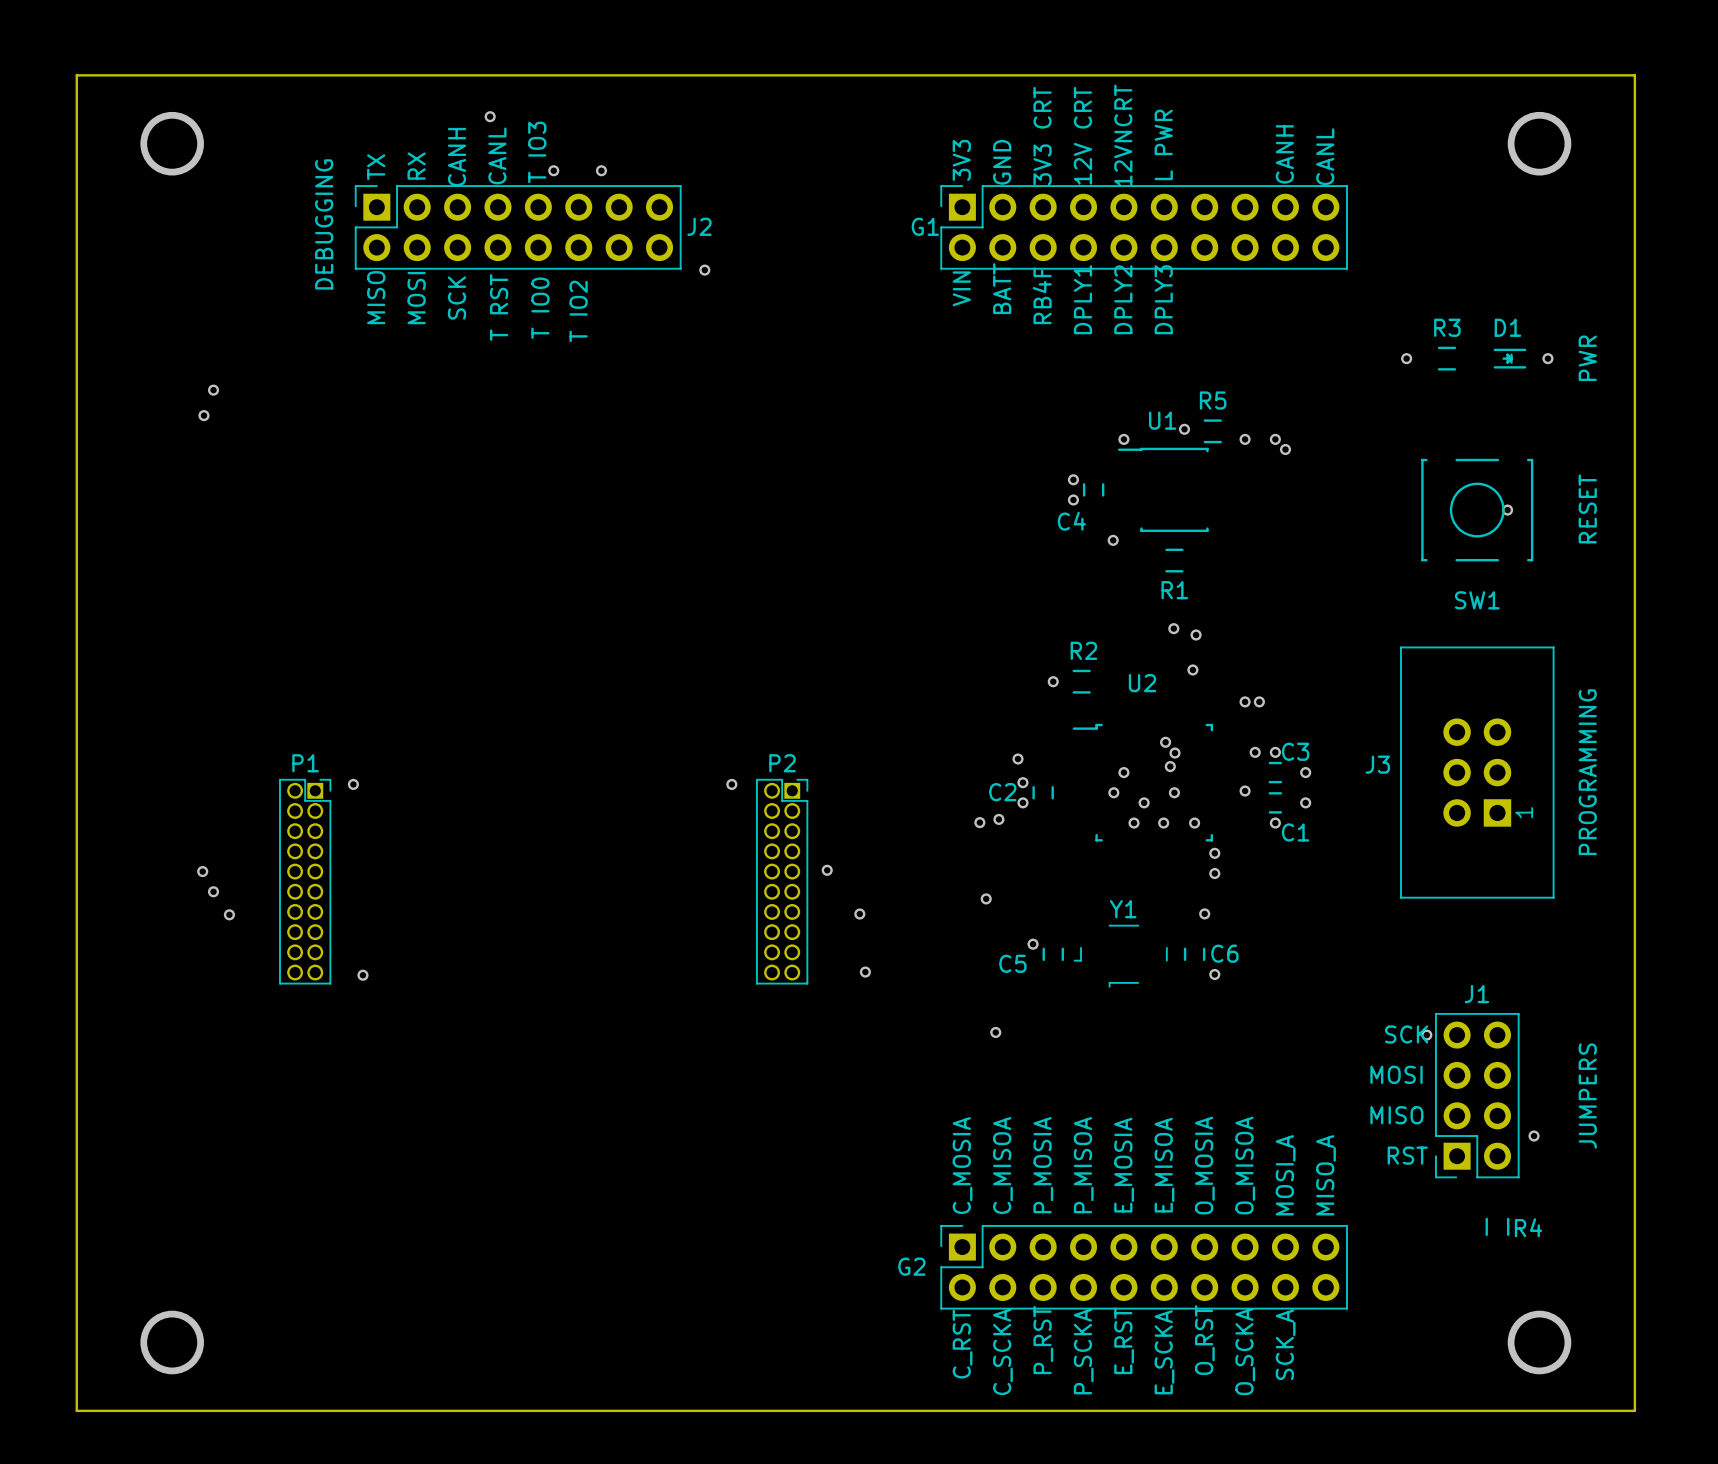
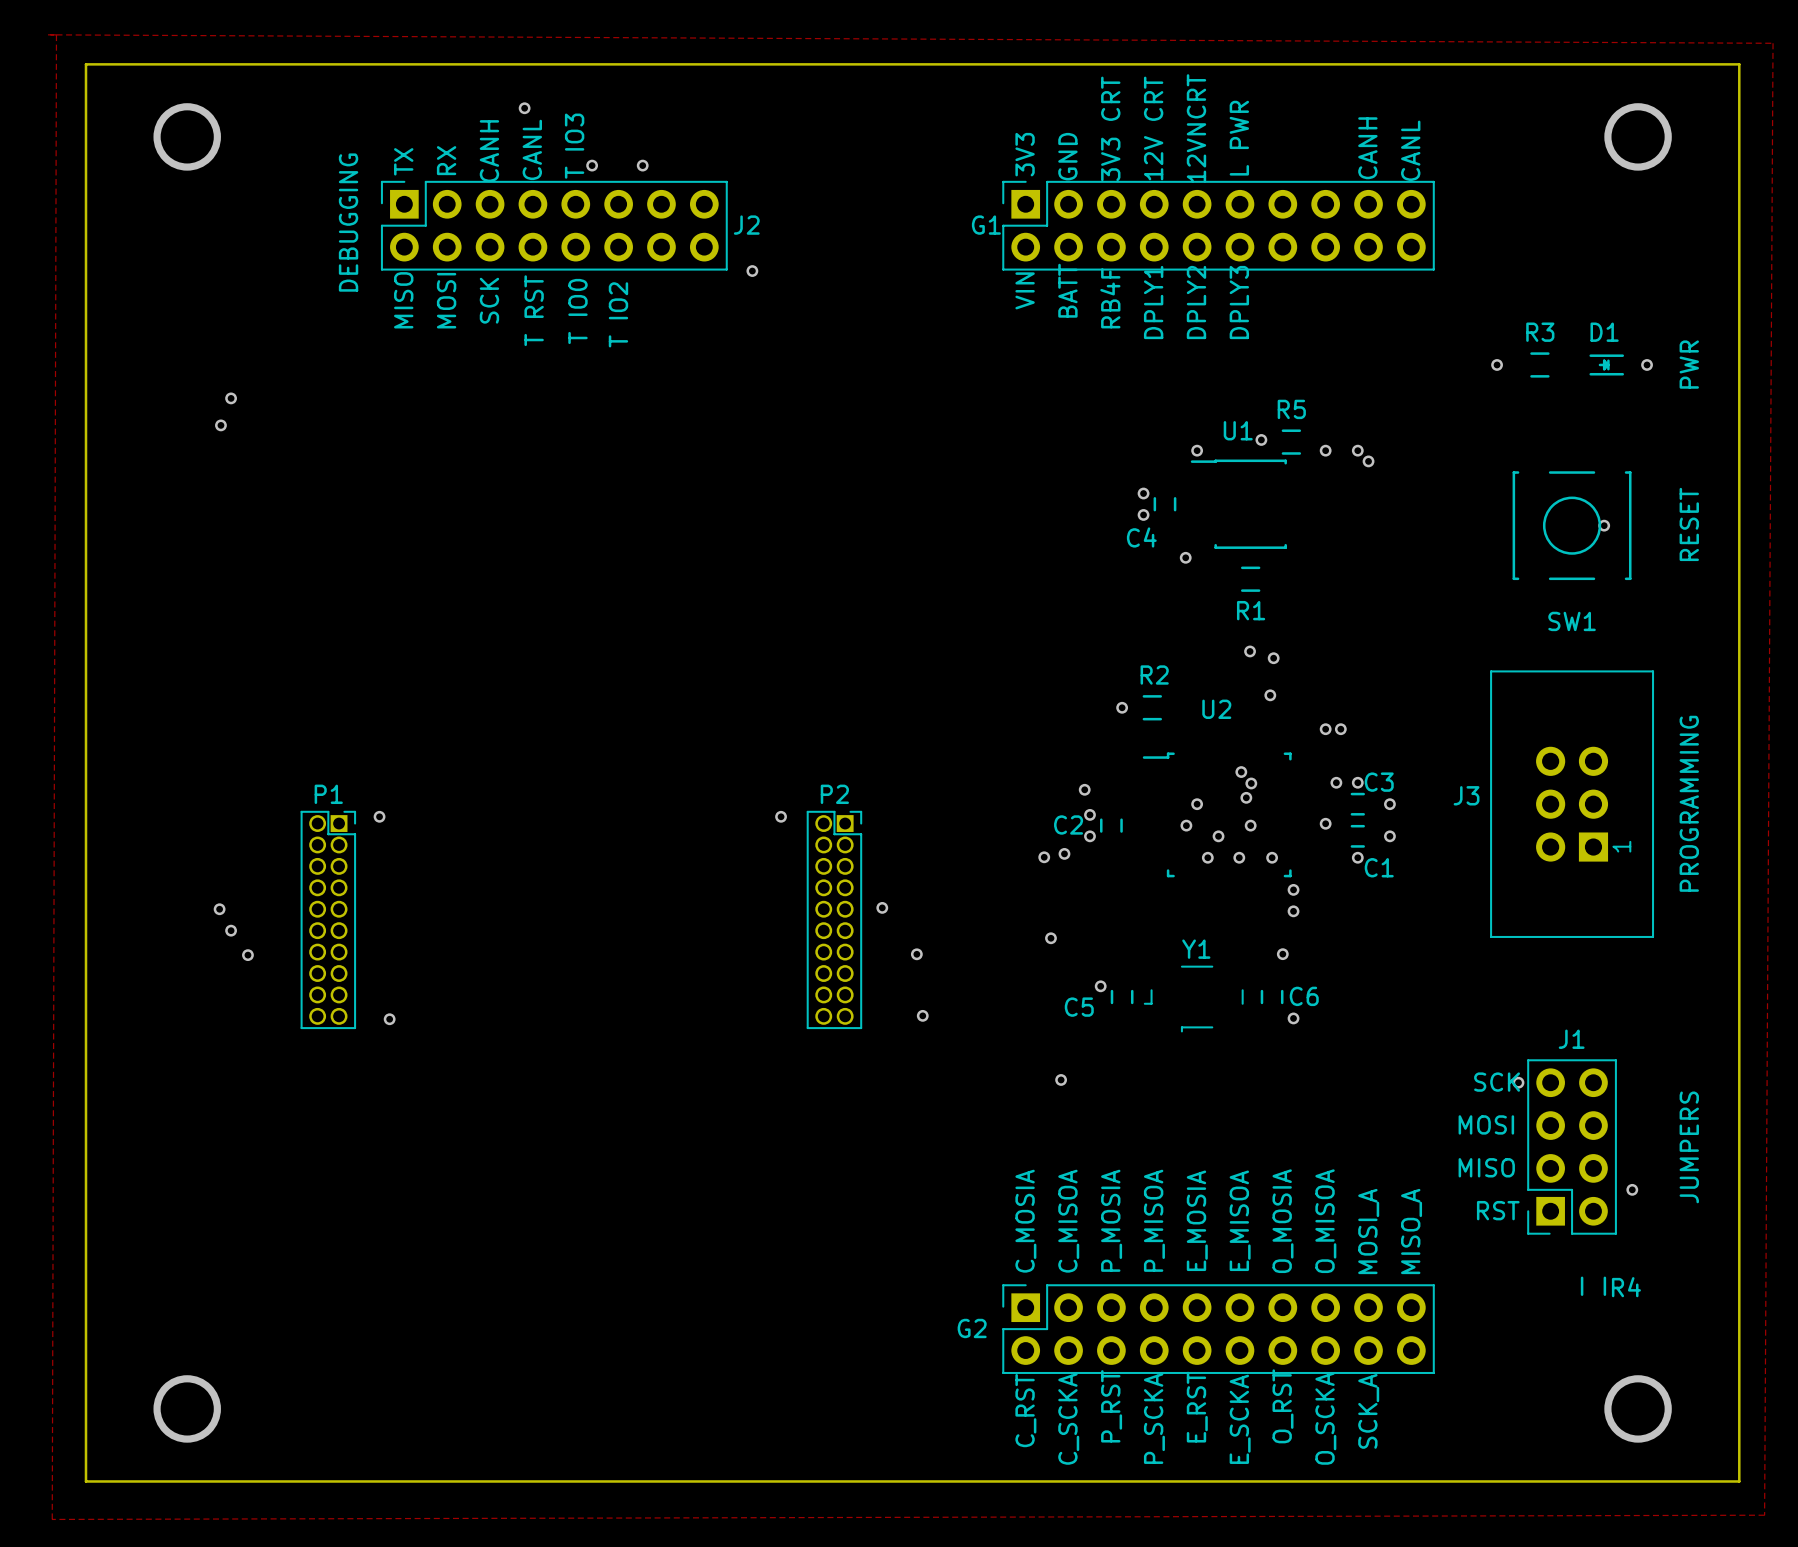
zone outline: none -> (48, 34) (1773, 43) (1764, 1515) (52, 1519) (56, 34) (48, 34)

